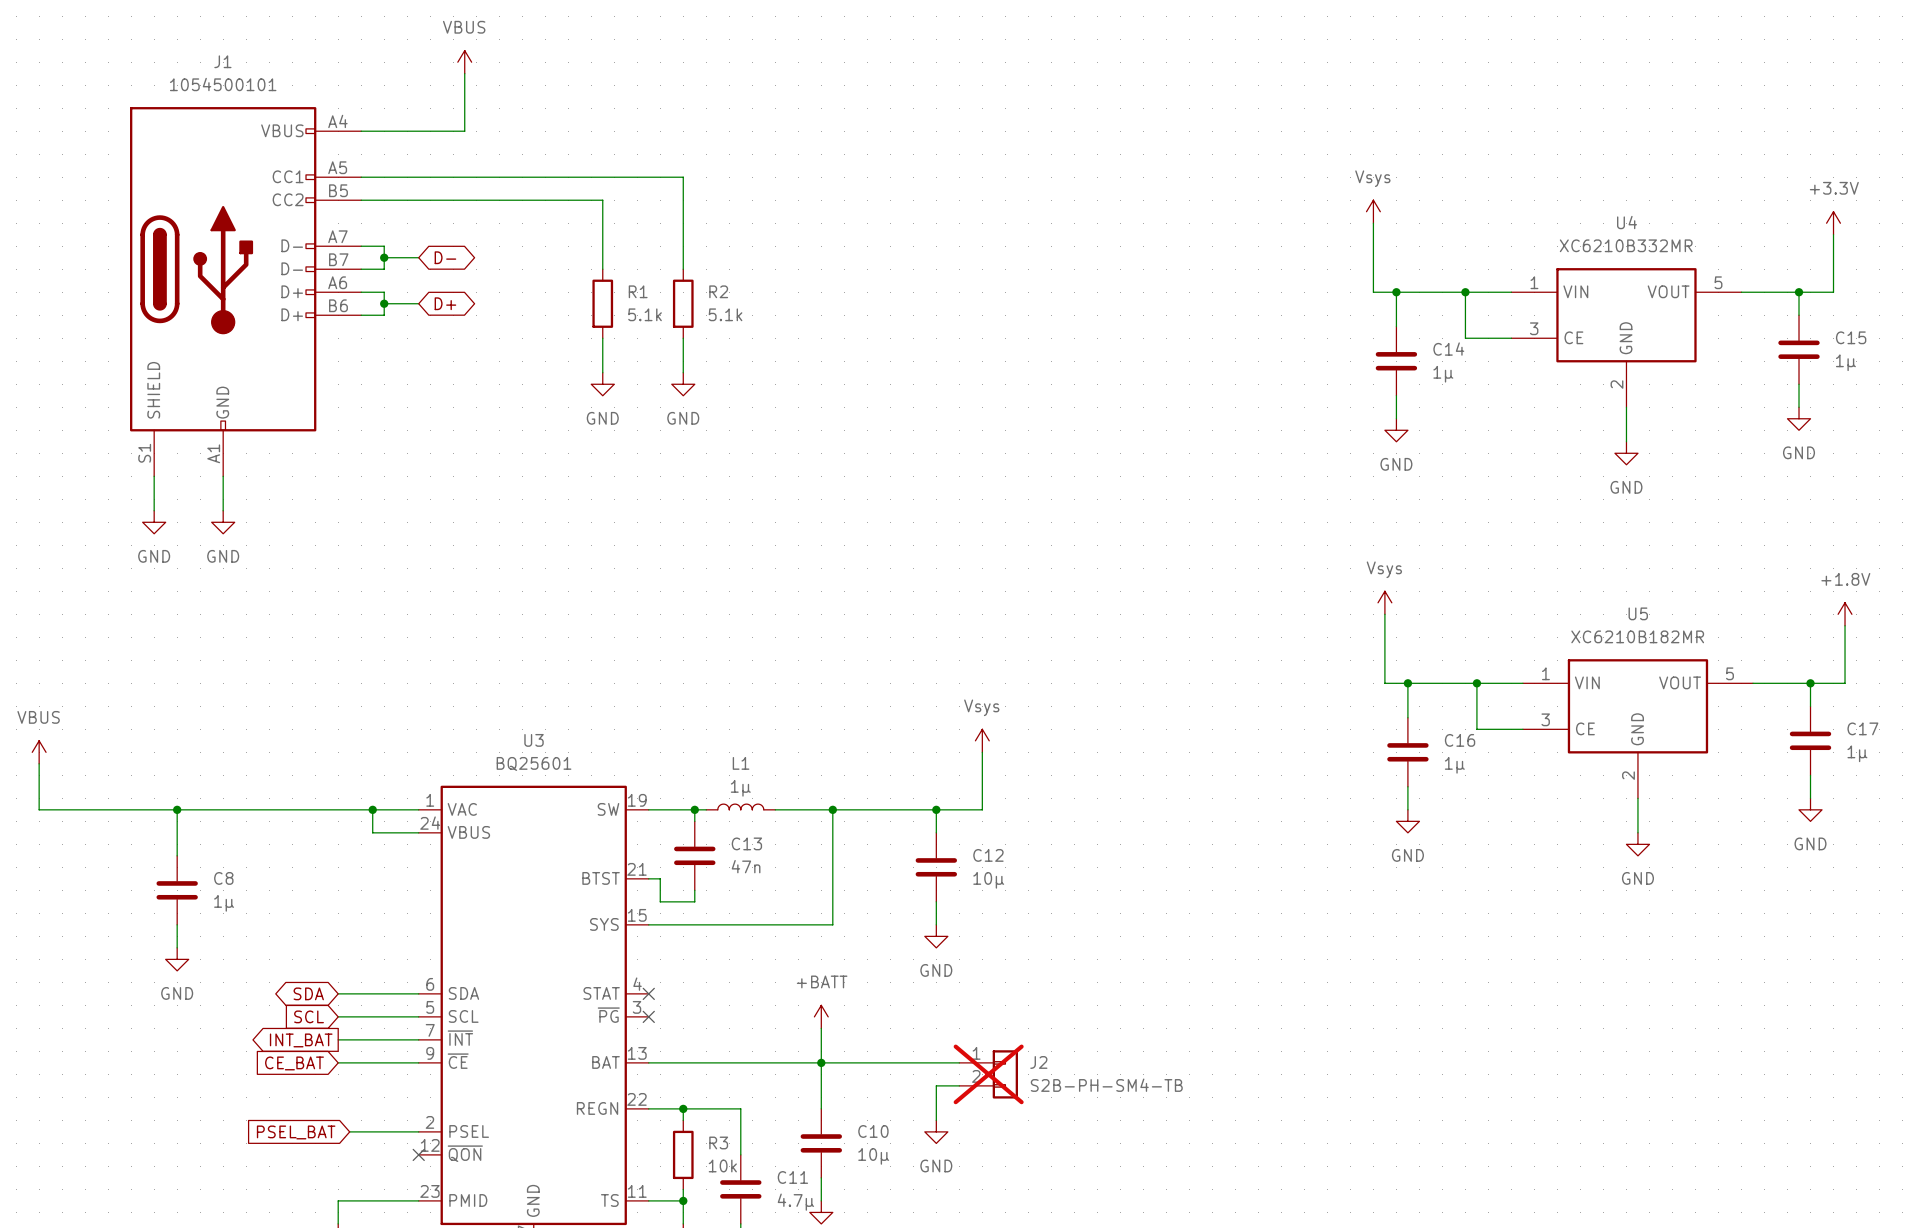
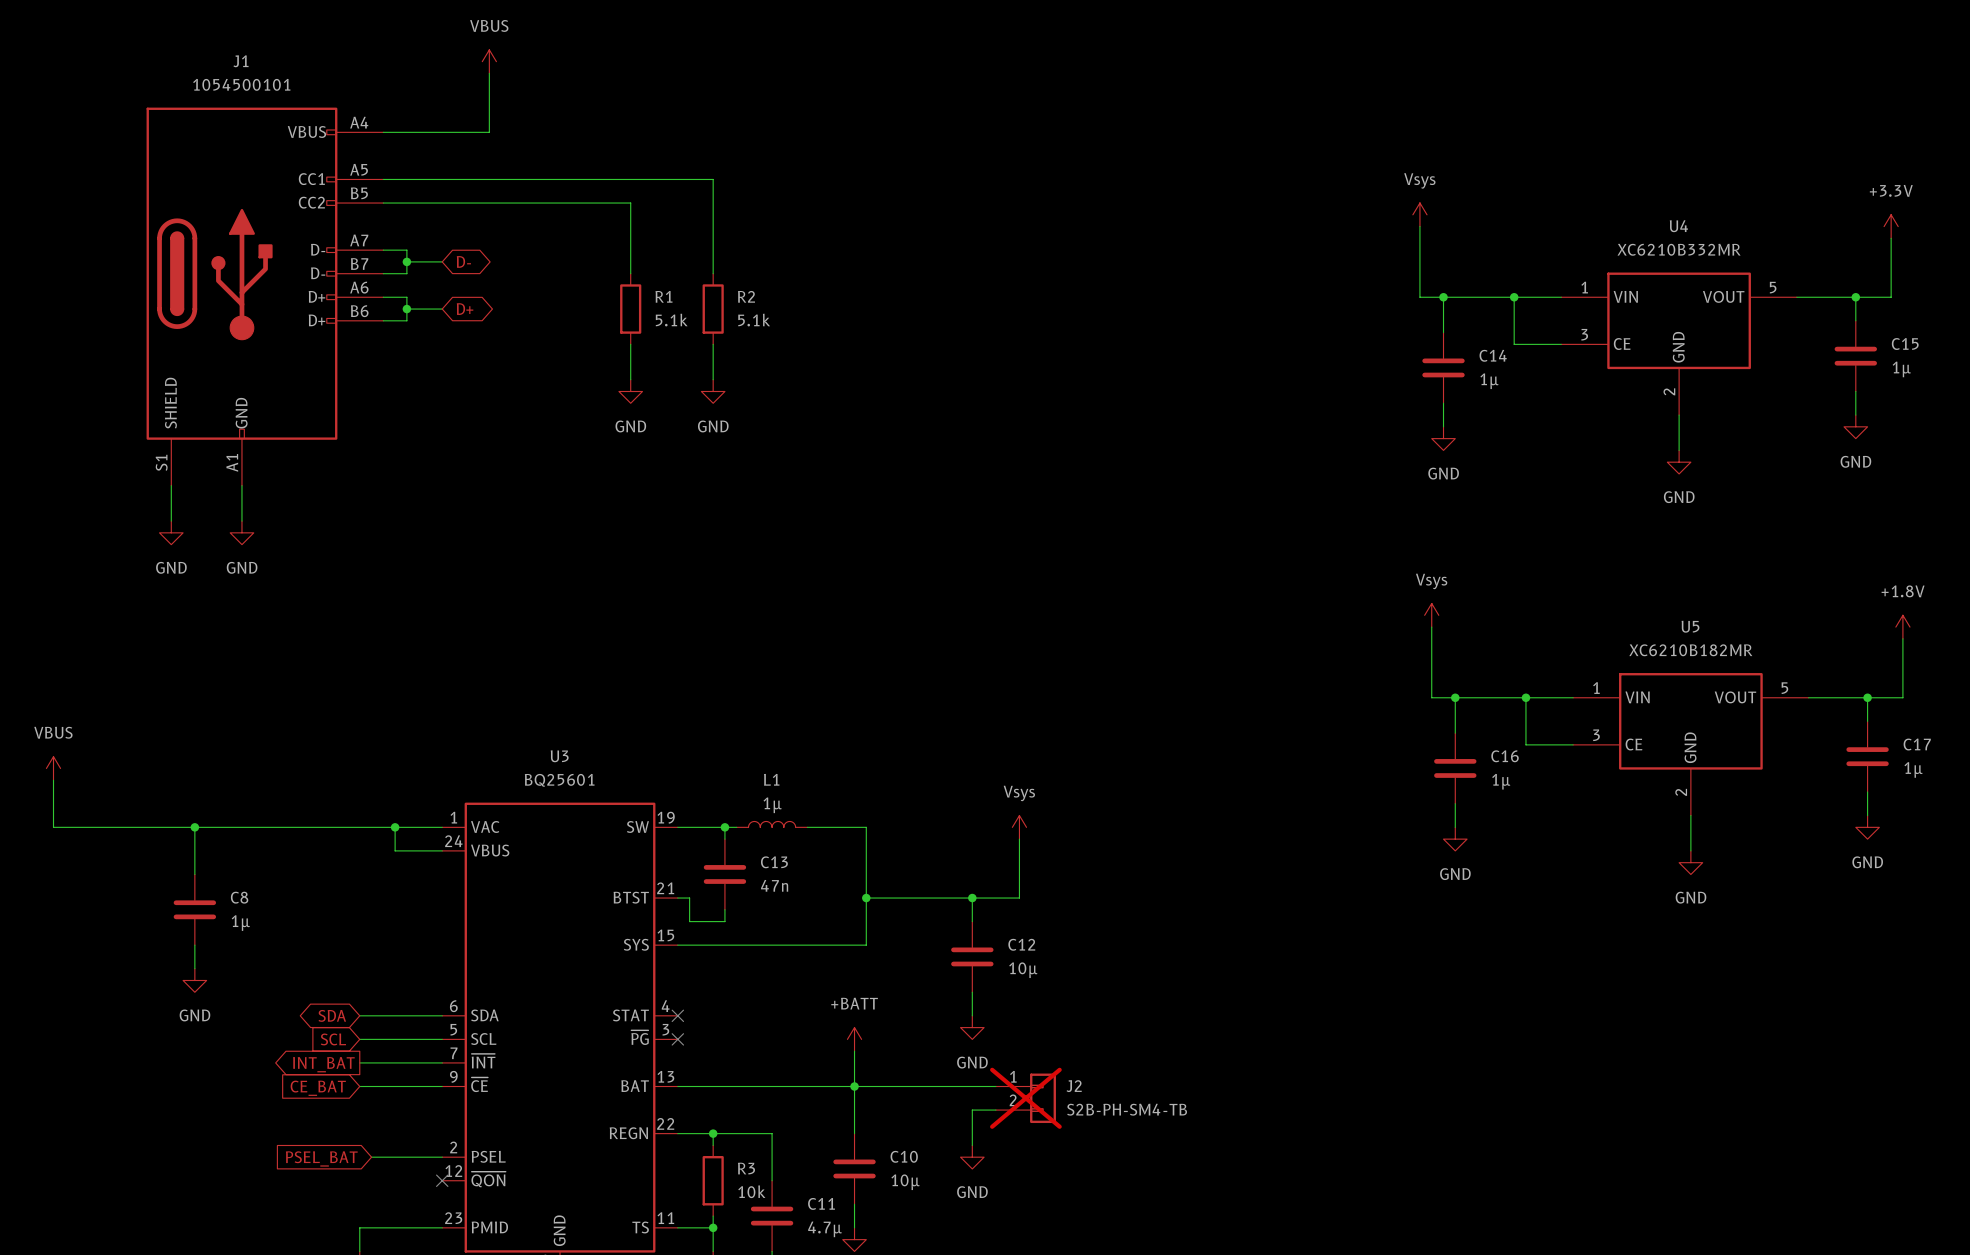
power symbol position: Vsys (982, 740) -> Vsys (1019, 827)
wire: (982, 752) (982, 809) (832, 809) -> (1019, 839) (1019, 898) (866, 898)
junction: (832, 809) -> none
wire: (936, 809) (936, 832) -> (972, 992) (972, 1015)
junction: (936, 809) -> none
C12 position: (936, 867) -> (972, 956)
junction: none -> (866, 898)
junction: none -> (972, 898)
power symbol position: GND (936, 936) -> GND (972, 1027)

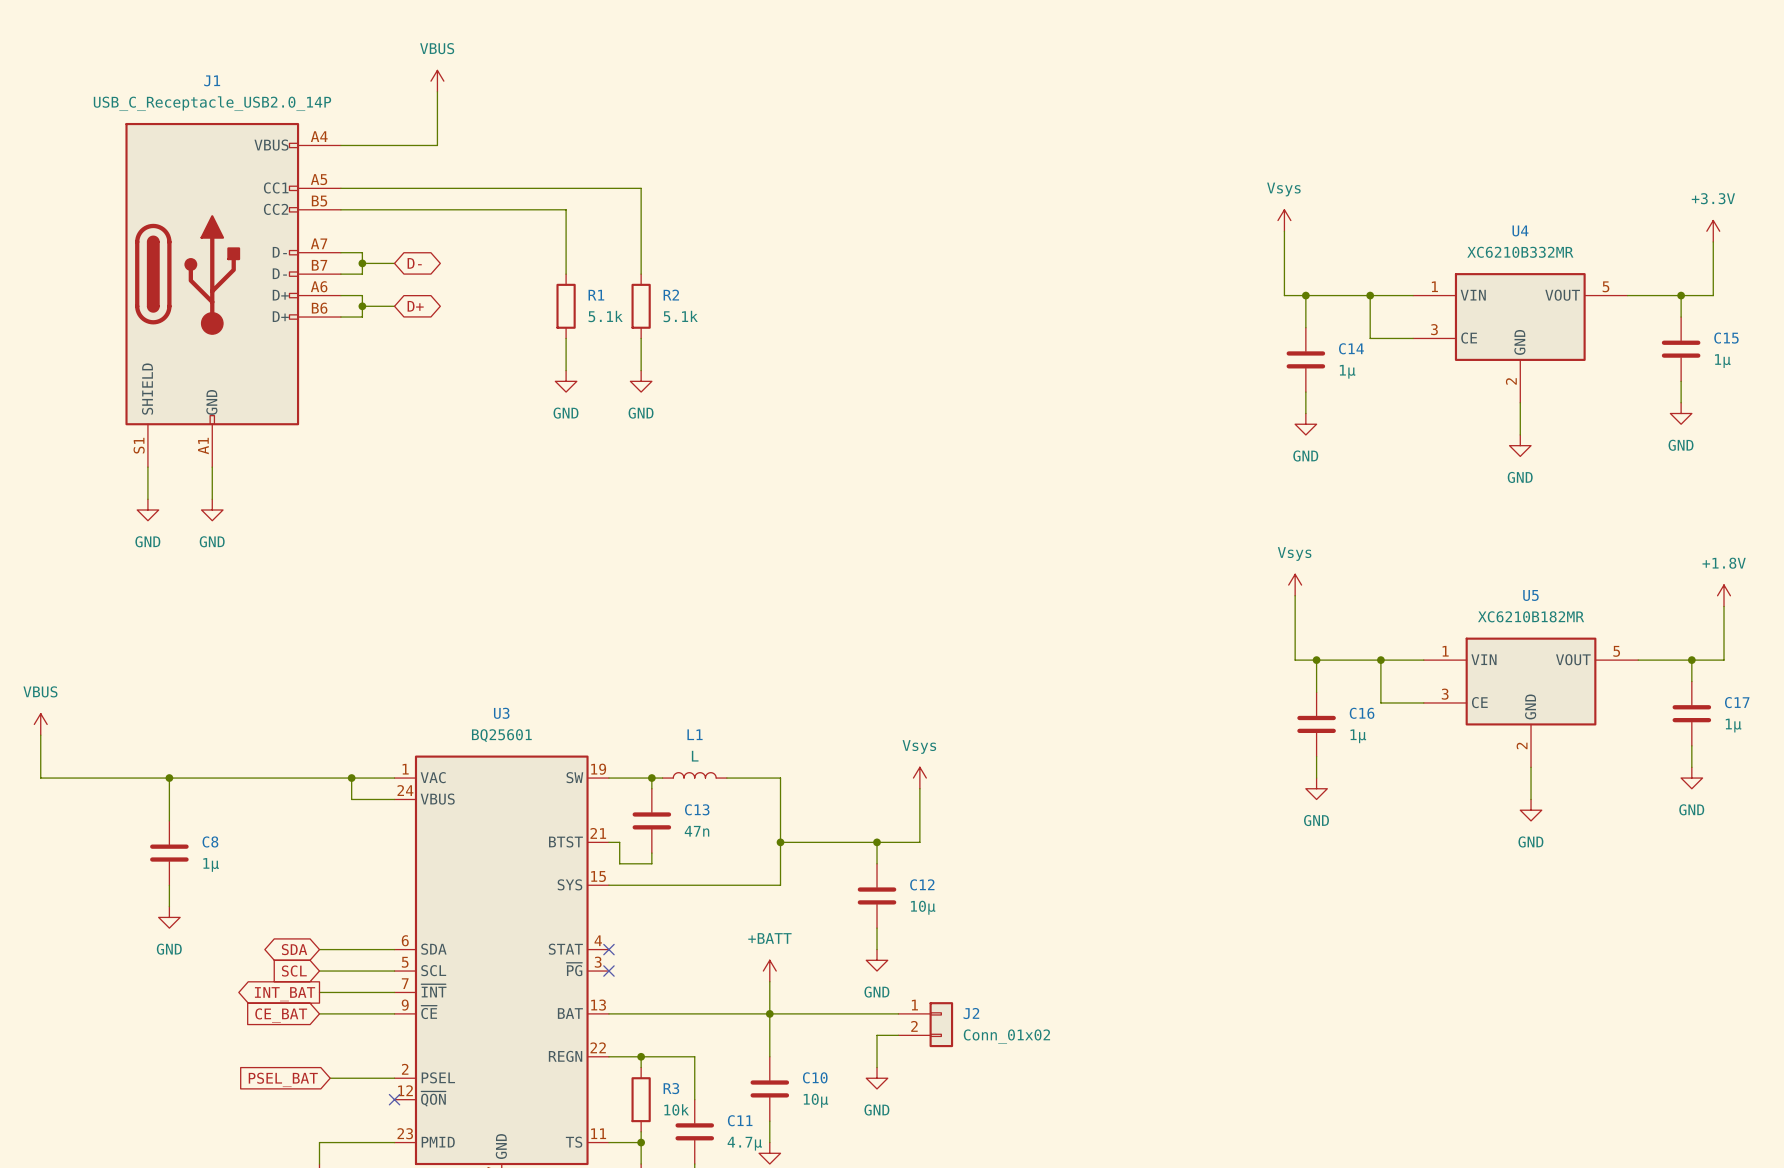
J1 value: 1054500101 (241, 84) -> USB_C_Receptacle_USB2.0_14P (212, 103)
L1 value: 1µ (772, 805) -> L (695, 756)
J2 do-not-place cross: (1025, 1098) -> none
J2 value: S2B-PH-SM4-TB (1127, 1109) -> Conn_01x02 (1006, 1036)

